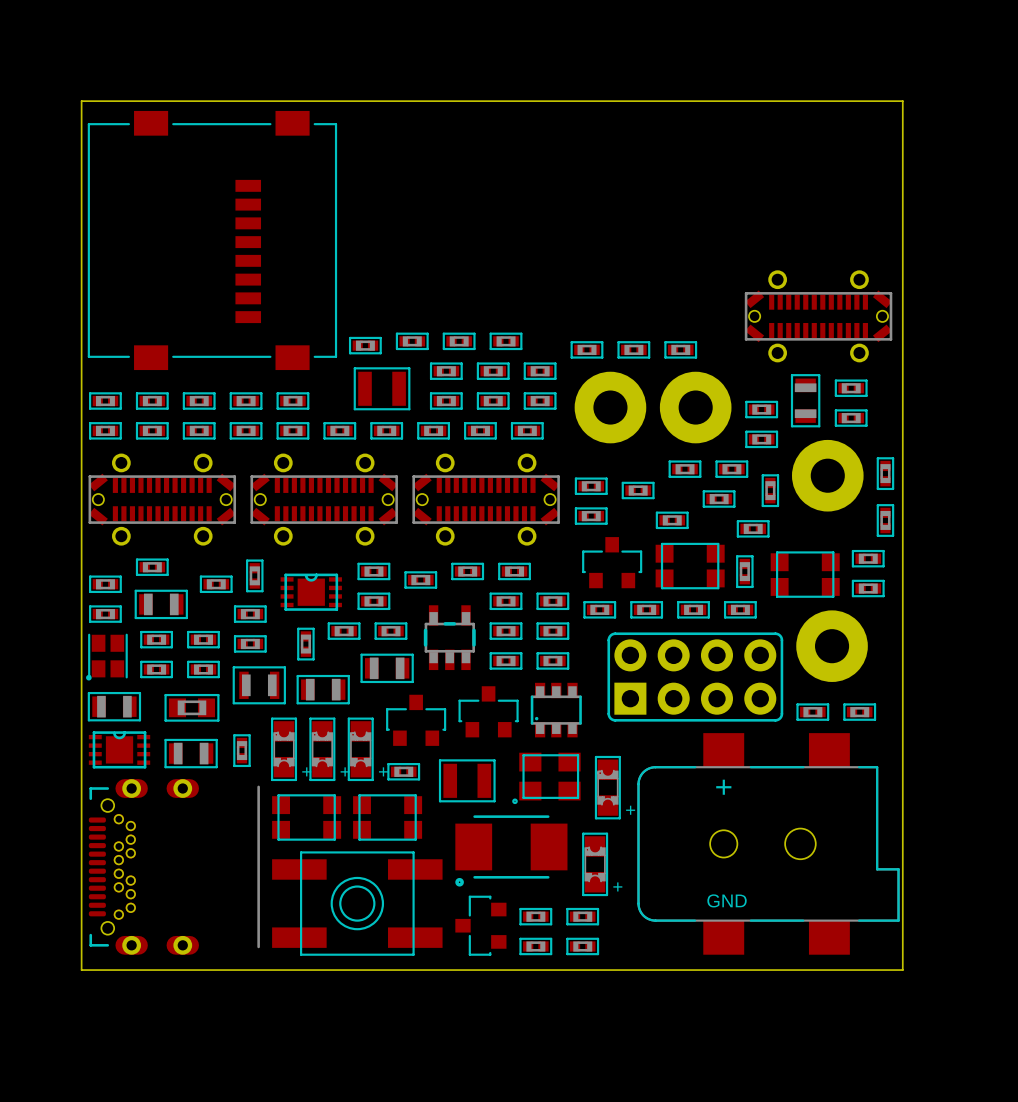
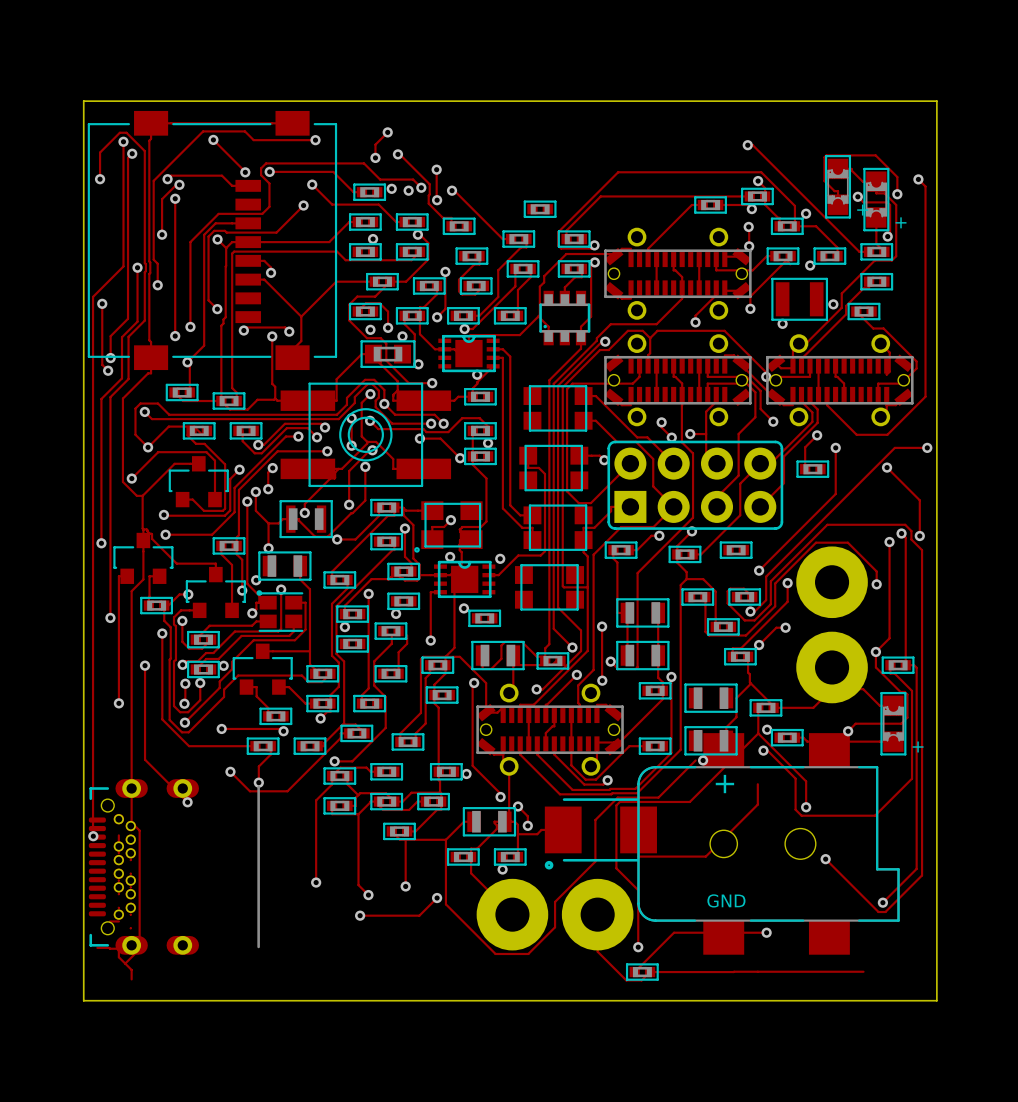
board edge: (83, 101) (81, 101) (81, 970) (902, 970) (902, 101) -> (83, 101) (83, 1000) (936, 1000) (936, 101) (902, 101)
track: none -> (292, 123) (151, 123) (151, 138) (149, 140) (149, 340) (151, 342) (151, 373) (148, 373) (122, 398) (122, 481) (136, 495) (142, 495)
track: none -> (387, 132) (375, 144) (375, 157)
via: none -> (387, 132)
track: none -> (213, 139) (245, 172)
via: none -> (213, 139)
track: none -> (315, 140) (253, 140) (244, 131) (203, 131) (153, 180) (153, 259) (157, 263) (157, 285)
via: none -> (315, 140)
track: none -> (123, 141) (123, 266) (93, 296) (93, 836)
via: none -> (123, 141)
track: none -> (747, 145) (752, 145) (859, 251) (869, 251)
via: none -> (747, 145)
track: none -> (132, 153) (128, 157) (128, 318) (110, 336) (110, 358)
via: none -> (132, 153)
track: none -> (397, 154) (429, 184) (428, 203) (442, 217) (451, 217) (451, 226)
via: none -> (397, 154)
via: none -> (375, 157)
track: none -> (838, 168) (851, 168) (862, 181) (876, 181) (876, 193) (884, 193) (896, 204) (896, 256) (891, 260) (874, 260) (841, 293) (841, 307) (805, 343) (798, 343) (792, 349) (792, 368) (780, 368) (775, 363)
track: none -> (436, 169) (437, 200)
via: none -> (436, 169)
track: none -> (269, 171) (333, 171) (353, 192) (361, 192)
via: none -> (269, 171)
via: none -> (245, 172)
track: none -> (100, 179) (100, 152) (119, 132) (126, 132) (144, 151) (144, 320) (128, 336) (128, 379) (110, 397) (110, 617)
via: none -> (100, 179)
track: none -> (167, 179) (171, 175) (221, 175) (232, 185) (248, 185)
via: none -> (167, 179)
track: none -> (918, 179) (925, 186) (925, 396) (887, 434) (856, 434) (827, 405) (827, 394)
via: none -> (918, 179)
track: none -> (758, 181) (765, 188) (765, 204) (779, 217) (779, 226)
via: none -> (758, 181)
track: none -> (179, 184) (176, 184) (162, 199) (162, 234)
via: none -> (179, 184)
track: none -> (312, 184) (332, 204) (378, 204) (396, 222) (404, 222)
via: none -> (312, 184)
part: none -> (838, 186)
track: none -> (421, 187) (413, 179) (380, 179) (364, 163) (266, 163) (261, 168) (261, 175) (269, 183) (269, 206) (262, 213) (218, 213) (190, 242) (190, 326)
via: none -> (421, 187)
via: none -> (391, 188)
via: none -> (408, 190)
track: none -> (452, 190) (454, 190) (502, 239) (511, 239)
via: none -> (452, 190)
part: none -> (369, 192)
track: none -> (897, 194) (897, 177) (875, 155) (826, 155) (824, 157) (824, 181) (834, 191) (838, 191) (838, 204)
via: none -> (897, 194)
track: none -> (749, 196) (600, 196) (566, 230) (566, 239)
part: none -> (757, 196)
track: none -> (857, 196) (863, 202) (887, 202) (890, 205) (890, 234) (887, 236)
via: none -> (857, 196)
track: none -> (175, 198) (175, 336)
via: none -> (175, 198)
part: none -> (876, 199)
via: none -> (437, 200)
track: none -> (702, 204) (691, 204) (648, 248) (648, 259)
part: none -> (710, 204)
track: none -> (718, 204) (747, 204) (751, 209)
track: none -> (303, 205) (276, 232) (214, 230) (208, 236) (208, 300) (217, 309)
via: none -> (303, 205)
part: none -> (540, 209)
via: none -> (751, 209)
via: none -> (806, 213)
track: none -> (876, 217) (876, 243) (884, 251)
track: none -> (357, 222) (349, 222) (329, 242) (232, 242) (226, 248)
part: none -> (365, 222)
part: none -> (412, 222)
track: none -> (248, 223) (215, 223) (204, 234) (204, 345) (187, 362) (189, 364) (189, 392)
part: none -> (459, 226)
track: none -> (748, 226) (749, 246)
via: none -> (748, 226)
part: none -> (787, 226)
via: none -> (162, 234)
track: none -> (417, 234) (428, 243) (428, 259) (406, 281) (390, 281) (375, 296) (357, 296) (349, 304) (349, 320) (367, 338) (380, 338) (386, 343) (386, 360) (408, 383) (432, 383)
via: none -> (417, 234)
via: none -> (887, 236)
track: none -> (217, 239) (226, 248)
via: none -> (217, 239)
via: none -> (373, 239)
part: none -> (518, 239)
track: none -> (526, 239) (526, 247) (521, 247) (498, 270) (498, 297) (479, 315) (471, 315)
part: none -> (574, 239)
track: none -> (594, 245) (591, 248) (561, 248) (558, 245) (558, 232) (618, 172) (761, 172) (794, 205) (794, 226) (816, 226) (837, 247) (837, 256)
via: none -> (594, 245)
via: none -> (749, 246)
track: none -> (226, 248) (225, 317) (221, 325) (221, 401)
track: none -> (631, 248) (621, 248) (613, 256) (611, 254) (566, 254) (544, 276) (544, 282) (539, 286) (538, 316)
part: none -> (365, 251)
part: none -> (412, 251)
track: none -> (419, 251) (411, 260) (345, 260) (337, 251) (234, 251) (232, 253) (232, 388) (236, 392) (236, 401)
part: none -> (876, 251)
part: none -> (471, 256)
track: none -> (479, 256) (479, 264) (474, 264) (459, 279) (459, 291) (462, 294) (475, 294) (483, 285)
track: none -> (724, 256) (741, 256)
track: none -> (775, 256) (766, 256) (752, 270) (716, 270) (716, 259)
part: none -> (783, 256)
part: none -> (829, 256)
track: none -> (656, 259) (656, 287)
track: none -> (673, 259) (673, 270) (682, 277) (682, 298) (656, 324) (610, 324) (553, 383) (553, 628) (572, 647)
track: none -> (699, 259) (699, 287)
track: none -> (248, 260) (264, 260) (271, 267) (271, 272)
track: none -> (594, 262) (591, 263) (591, 316) (581, 326) (581, 348) (549, 380) (549, 644) (545, 648) (545, 656) (536, 656) (521, 641) (505, 641) (501, 645) (501, 658) (491, 669) (482, 669) (482, 655)
via: none -> (594, 262)
track: none -> (790, 264) (784, 262) (750, 296) (750, 308)
via: none -> (810, 265)
track: none -> (137, 267) (137, 321) (122, 337) (122, 378) (101, 398) (101, 543)
via: none -> (137, 267)
track: none -> (515, 268) (515, 286) (472, 329) (464, 329)
part: none -> (523, 268)
track: none -> (530, 268) (530, 277) (517, 290) (517, 315)
part: none -> (574, 268)
track: none -> (581, 268) (581, 277) (575, 277) (564, 287) (564, 298)
track: none -> (445, 271) (445, 309) (437, 317)
via: none -> (445, 271)
via: none -> (271, 272)
part: none -> (677, 273)
track: none -> (248, 279) (264, 279) (301, 316)
track: none -> (374, 281) (336, 281) (301, 316)
part: none -> (382, 281)
track: none -> (869, 281) (869, 288) (863, 288) (846, 305) (846, 314) (801, 358) (801, 366)
part: none -> (876, 281)
via: none -> (157, 285)
part: none -> (429, 285)
track: none -> (436, 285) (436, 294) (423, 307) (419, 307) (419, 334) (435, 349) (454, 349) (458, 353) (468, 353) (470, 335) (519, 335) (538, 316)
part: none -> (476, 285)
track: none -> (716, 287) (716, 295) (695, 315) (695, 322)
track: none -> (613, 290) (621, 298) (631, 298)
track: none -> (724, 290) (741, 290)
part: none -> (799, 299)
track: none -> (102, 303) (102, 364) (108, 370)
via: none -> (102, 303)
via: none -> (833, 304)
via: none -> (750, 308)
via: none -> (217, 309)
track: none -> (357, 311) (366, 303) (379, 303) (388, 311) (388, 327)
part: none -> (365, 311)
track: none -> (856, 311) (873, 328) (883, 328) (916, 361) (916, 368) (901, 383) (878, 383) (878, 394)
part: none -> (863, 311)
track: none -> (404, 315) (404, 324) (414, 334) (414, 360) (418, 364)
part: none -> (463, 315)
part: none -> (510, 315)
track: none -> (301, 316) (301, 341) (292, 349) (292, 357)
track: none -> (538, 316) (548, 326) (548, 337)
part: (818, 316) -> none
via: none -> (437, 317)
via: none -> (695, 322)
via: none -> (782, 323)
via: none -> (190, 326)
via: none -> (388, 327)
via: none -> (370, 329)
via: none -> (464, 329)
track: none -> (243, 330) (246, 327) (285, 327) (289, 331)
via: none -> (243, 330)
via: none -> (289, 331)
via: none -> (175, 336)
track: none -> (272, 336) (272, 383) (275, 386) (275, 398)
via: none -> (272, 336)
via: none -> (402, 336)
track: none -> (650, 338) (642, 330) (627, 330) (608, 350) (600, 350) (562, 387) (562, 586) (587, 587)
track: none -> (650, 338) (657, 330) (724, 330) (766, 372) (766, 376) (810, 376) (810, 366)
track: none -> (650, 338) (648, 366)
part position: (412, 341) -> (412, 315)
part: (459, 341) -> none
part: (506, 341) -> none
track: none -> (605, 341) (602, 341) (558, 385) (558, 607) (581, 630) (581, 651) (542, 689) (536, 689)
via: none -> (605, 341)
track: none -> (880, 343) (889, 352) (889, 371) (886, 374) (886, 366)
part: (365, 345) -> none
track: none -> (493, 349) (502, 349) (510, 356) (510, 505) (520, 515) (532, 515)
part: (586, 349) -> none
part: (633, 349) -> none
part: (680, 349) -> none
part: none -> (468, 353)
track: none -> (370, 354) (397, 381) (397, 390) (393, 394) (393, 400) (454, 400) (458, 396) (472, 396) (472, 388) (493, 366)
track: none -> (373, 354) (361, 354) (336, 379) (336, 400) (277, 400) (275, 398)
track: none -> (724, 355) (733, 355) (773, 397) (783, 405) (792, 405)
track: none -> (493, 357) (502, 357) (502, 508) (522, 527) (532, 527) (532, 540)
via: none -> (110, 358)
via: none -> (187, 362)
via: none -> (418, 364)
track: none -> (639, 366) (639, 376) (632, 383) (572, 383) (567, 389) (567, 491) (578, 503) (590, 503) (630, 463)
track: none -> (656, 366) (656, 394)
track: none -> (673, 366) (673, 376) (682, 383) (681, 442) (693, 453) (693, 517) (637, 573) (637, 667) (635, 669) (618, 669) (610, 661)
track: none -> (699, 366) (699, 394)
track: none -> (707, 366) (707, 376) (746, 376) (760, 390) (760, 409) (773, 421)
track: none -> (818, 366) (818, 394)
track: none -> (835, 366) (835, 376) (844, 383) (844, 394)
via: none -> (108, 370)
part: (446, 371) -> none
part: (493, 371) -> none
part: (540, 371) -> none
via: none -> (477, 374)
via: none -> (766, 376)
part footprint: [834, 379, 868, 397] -> [766, 334, 914, 427]
part: none -> (677, 380)
via: none -> (432, 383)
part: (382, 388) -> none
track: none -> (174, 392) (183, 401) (221, 401)
part: none -> (182, 392)
track: none -> (370, 394) (361, 402) (361, 436) (367, 441)
via: none -> (370, 394)
track: none -> (707, 394) (707, 383) (746, 383) (755, 392) (755, 417) (738, 433) (738, 475) (716, 497) (716, 506)
track: none -> (716, 394) (716, 401) (706, 411) (706, 452) (716, 463)
track: none -> (801, 394) (801, 401) (812, 412) (812, 421) (770, 463) (760, 463) (740, 483) (740, 515) (701, 554) (692, 554)
track: none -> (810, 394) (810, 401) (817, 409) (817, 422) (784, 456) (784, 483) (760, 506)
track: none -> (583, 396) (595, 396) (637, 437) (647, 437) (673, 463)
track: none -> (613, 397) (621, 405) (631, 405)
track: none -> (903, 397) (895, 405) (886, 405)
track: none -> (275, 398) (257, 399) (247, 409) (230, 409) (221, 401)
part: (805, 400) -> none
part: (105, 401) -> none
part: (152, 401) -> none
part: (199, 401) -> none
part: none -> (229, 401)
part: (246, 401) -> none
part: (292, 401) -> none
part: (446, 401) -> none
part position: (493, 401) -> (480, 396)
part: (540, 401) -> none
via: none -> (384, 403)
part: (610, 407) -> none
part: (695, 407) -> none
part: none -> (558, 408)
part: (761, 409) -> none
track: none -> (144, 411) (152, 419) (338, 419) (354, 403) (354, 397) (367, 384) (372, 384) (378, 390) (375, 407) (392, 423) (431, 423)
via: none -> (144, 411)
track: none -> (351, 418) (351, 445)
via: none -> (351, 418)
part: (851, 418) -> none
track: none -> (370, 420) (378, 429) (423, 429) (426, 432) (448, 432) (462, 418) (479, 418) (488, 426)
via: none -> (370, 420)
track: none -> (583, 420) (595, 420) (616, 441) (635, 441) (653, 459) (653, 486) (673, 506) (653, 527) (621, 527) (593, 554) (593, 670) (578, 685) (579, 715)
via: none -> (773, 421)
track: none -> (661, 422) (661, 427) (671, 437)
via: none -> (661, 422)
via: none -> (431, 423)
track: none -> (443, 423) (434, 414) (395, 414) (384, 403) (384, 389) (374, 379) (365, 379) (346, 397) (346, 404) (336, 414) (169, 414) (158, 403) (140, 403) (135, 408) (135, 434) (148, 447) (168, 426) (194, 426) (202, 435)
via: none -> (443, 423)
track: none -> (472, 426) (472, 464) (486, 478) (486, 521) (481, 526) (462, 526) (459, 529) (460, 539) (458, 545) (461, 552) (461, 563) (450, 575) (419, 575)
track: none -> (325, 427) (321, 423) (284, 423) (263, 444) (258, 444)
via: none -> (325, 427)
part: (105, 430) -> none
part: (152, 430) -> none
track: none -> (242, 430) (242, 441) (254, 453) (261, 453) (286, 428) (307, 428) (317, 437)
part: (292, 430) -> none
part: (339, 430) -> none
part: (386, 430) -> none
part: (433, 430) -> none
part: (527, 430) -> none
part: none -> (365, 434)
track: none -> (690, 434) (706, 434)
via: none -> (690, 434)
track: none -> (187, 435) (196, 443) (204, 443) (225, 464) (225, 508) (222, 510) (204, 510) (192, 499) (182, 499)
track: none -> (817, 435) (805, 447) (805, 469)
via: none -> (817, 435)
track: none -> (298, 436) (285, 436) (234, 487) (234, 512) (212, 534) (165, 534)
via: none -> (298, 436)
via: none -> (317, 437)
via: none -> (671, 437)
track: none -> (419, 438) (440, 438) (460, 458)
via: none -> (419, 438)
part: (761, 439) -> none
part footprint: [791, 439, 864, 512] -> [796, 460, 830, 478]
track: none -> (367, 441) (376, 441) (393, 459) (393, 468) (423, 468)
track: none -> (367, 441) (341, 468) (307, 468)
via: none -> (488, 443)
via: none -> (258, 444)
via: none -> (351, 445)
via: none -> (148, 447)
track: none -> (835, 447) (835, 494) (759, 570)
via: none -> (835, 447)
track: none -> (927, 447) (894, 447) (766, 576) (766, 600) (754, 611) (750, 611)
via: none -> (927, 447)
track: none -> (372, 450) (369, 450) (349, 471) (349, 504)
via: none -> (372, 450)
track: none -> (327, 451) (277, 451) (238, 489) (238, 535) (236, 537) (236, 554) (242, 559) (242, 590)
via: none -> (327, 451)
track: none -> (528, 455) (528, 467) (538, 467) (544, 474) (544, 551) (540, 555) (518, 555) (498, 575) (488, 575)
track: none -> (579, 455) (599, 455) (604, 460)
part: none -> (480, 456)
via: none -> (460, 458)
via: none -> (604, 460)
track: none -> (198, 463) (174, 463) (142, 495)
track: none -> (365, 466) (365, 500) (327, 536) (315, 536) (298, 519) (282, 519) (278, 523) (268, 523)
via: none -> (365, 466)
track: none -> (887, 467) (919, 500) (919, 536)
via: none -> (887, 467)
track: none -> (272, 468) (268, 472) (268, 489)
via: none -> (272, 468)
part: none -> (553, 468)
track: none -> (239, 469) (230, 479) (230, 510) (224, 515) (163, 514)
via: none -> (239, 469)
track: none -> (338, 469) (335, 472) (335, 477) (330, 478) (304, 504) (304, 512)
part: (684, 469) -> none
part: (731, 469) -> none
part: (885, 473) -> none
track: none -> (131, 478) (158, 452) (206, 452) (214, 460) (214, 499)
via: none -> (131, 478)
part: none -> (198, 481)
part: (591, 486) -> none
via: none -> (268, 489)
part: (638, 490) -> none
part: (770, 490) -> none
track: none -> (255, 491) (255, 510) (268, 523)
via: none -> (255, 491)
track: none -> (142, 495) (142, 528) (152, 534) (152, 538) (176, 563) (215, 563) (215, 574)
part: (162, 499) -> none
part: (324, 499) -> none
part: (486, 499) -> none
part: (719, 499) -> none
track: none -> (247, 501) (247, 583) (259, 595) (259, 602)
via: none -> (247, 501)
via: none -> (349, 504)
track: none -> (630, 506) (611, 506) (611, 511) (594, 527) (583, 527) (583, 552) (587, 556) (587, 650) (533, 704) (520, 704) (520, 715)
track: none -> (379, 507) (379, 515) (355, 539) (337, 539)
part: none -> (386, 507)
track: none -> (403, 508) (406, 510) (432, 510)
via: none -> (304, 512)
via: none -> (163, 514)
part: (591, 516) -> none
track: none -> (450, 520) (444, 526) (432, 526) (432, 539)
via: none -> (450, 520)
part: (672, 520) -> none
part: (885, 520) -> none
track: none -> (268, 523) (268, 548)
part: none -> (558, 527)
track: none -> (404, 528) (404, 556) (411, 563) (411, 571)
via: none -> (404, 528)
part: (753, 528) -> none
track: none -> (143, 529) (143, 579) (131, 591) (131, 822) (139, 830) (139, 949) (125, 963)
track: none -> (691, 531) (677, 546) (677, 562) (686, 572) (686, 579)
via: none -> (691, 531)
track: none -> (901, 533) (905, 537) (905, 665) (914, 665) (916, 667) (916, 868) (882, 902)
via: none -> (901, 533)
via: none -> (165, 534)
track: none -> (659, 535) (651, 535) (637, 550) (628, 550)
via: none -> (659, 535)
via: none -> (919, 536)
part footprint: [582, 537, 643, 589] -> [604, 541, 638, 559]
via: none -> (337, 539)
part: none -> (386, 541)
track: none -> (394, 541) (394, 550) (336, 606) (336, 653) (344, 661) (344, 724)
part footprint: [655, 542, 725, 590] -> [668, 545, 702, 564]
track: none -> (889, 542) (889, 638) (875, 651) (875, 667) (900, 691) (904, 691) (907, 694) (907, 717) (901, 723) (855, 723) (848, 731)
via: none -> (889, 542)
via: none -> (101, 543)
track: none -> (221, 545) (221, 554) (232, 564) (232, 610)
part: none -> (229, 545)
via: none -> (268, 548)
track: none -> (613, 550) (613, 558) (617, 562) (617, 612) (627, 612) (627, 655)
part: none -> (736, 550)
via: none -> (450, 556)
part footprint: [135, 558, 169, 576] -> [113, 532, 174, 584]
via: none -> (500, 558)
part: (868, 558) -> none
part footprint: [451, 562, 485, 581] -> [434, 560, 496, 599]
part: none -> (284, 566)
track: none -> (300, 566) (300, 579) (309, 589) (309, 664) (315, 669) (315, 673)
via: none -> (759, 570)
part: (373, 571) -> none
part: none -> (403, 571)
part: (514, 571) -> none
part: (744, 571) -> none
part: (805, 574) -> none
part footprint: [199, 575, 233, 594] -> [185, 566, 246, 619]
part: (254, 575) -> none
track: none -> (127, 576) (118, 576) (118, 703)
track: none -> (159, 576) (149, 576) (148, 605)
part: none -> (339, 579)
track: none -> (347, 579) (347, 588) (331, 603) (331, 655) (338, 662) (338, 686) (330, 695) (330, 711) (327, 711) (320, 718)
track: none -> (388, 579) (371, 579) (344, 605) (344, 614)
track: none -> (388, 579) (392, 576) (399, 576) (405, 580) (417, 580) (419, 577) (419, 564) (413, 558) (413, 525) (403, 515) (402, 507) (394, 507) (394, 515) (387, 515) (332, 571) (332, 579)
part: (420, 579) -> none
track: none -> (464, 579) (454, 579) (454, 647) (445, 656) (445, 673) (434, 684) (434, 703) (438, 707) (440, 792)
track: none -> (686, 579) (680, 585) (680, 749) (637, 793) (559, 794) (520, 754) (520, 743)
track: none -> (686, 579) (703, 579) (715, 591) (715, 626)
via: none -> (256, 580)
part: none -> (832, 582)
track: none -> (787, 583) (787, 601) (741, 648) (732, 648) (732, 656)
via: none -> (787, 583)
part: (105, 584) -> none
track: none -> (876, 584) (876, 571) (847, 542) (816, 542) (775, 583) (775, 606) (745, 635) (709, 635) (705, 631) (705, 597)
via: none -> (876, 584)
part: (868, 588) -> none
part footprint: [134, 589, 188, 620] -> [140, 596, 174, 615]
track: none -> (281, 589) (281, 628) (278, 631) (234, 631) (213, 653) (206, 653) (198, 661) (186, 661) (182, 664)
via: none -> (281, 589)
via: none -> (242, 590)
part: (311, 592) -> none
track: none -> (440, 592) (430, 592) (430, 640)
part footprint: [536, 592, 570, 611] -> [515, 564, 585, 611]
track: none -> (368, 593) (368, 688) (361, 695) (361, 703)
via: none -> (368, 593)
track: none -> (188, 594) (179, 594) (164, 609)
via: none -> (188, 594)
part: none -> (744, 597)
track: none -> (752, 597) (743, 588) (730, 588) (727, 591) (727, 603) (744, 620) (754, 620) (770, 604) (770, 581) (827, 524) (905, 524) (911, 530) (911, 539) (922, 550) (922, 875) (885, 912) (878, 912) (825, 859)
part: (373, 601) -> none
part: none -> (403, 601)
part: (506, 601) -> none
part footprint: [630, 601, 664, 619] -> [616, 598, 670, 628]
track: none -> (268, 602) (256, 602) (256, 609) (252, 613)
track: none -> (293, 602) (305, 602) (305, 629) (294, 640) (253, 640) (232, 661) (232, 669) (219, 681) (219, 687) (184, 722)
track: none -> (164, 605) (164, 620) (170, 627) (169, 720) (181, 732) (188, 732) (224, 696) (224, 689) (238, 675) (301, 675) (308, 682) (322, 682) (330, 673)
via: none -> (463, 608)
part: (599, 609) -> none
part position: (693, 609) -> (697, 597)
part: (740, 609) -> none
track: none -> (199, 610) (181, 610) (173, 617) (175, 626) (174, 706) (180, 712) (188, 712) (200, 700) (200, 682)
via: none -> (750, 611)
track: none -> (658, 612) (658, 677) (662, 682) (662, 699) (619, 742) (596, 742) (596, 760) (590, 766)
via: none -> (252, 613)
via: none -> (396, 613)
part: (105, 614) -> none
part: (250, 614) -> none
part: none -> (352, 614)
via: none -> (110, 617)
part: none -> (484, 618)
track: none -> (182, 620) (182, 641) (189, 648) (202, 648) (211, 639)
via: none -> (182, 620)
track: none -> (268, 621) (256, 621) (252, 625) (209, 625) (195, 639)
track: none -> (293, 621) (293, 631) (289, 635) (241, 635) (218, 658) (206, 658) (195, 669)
track: none -> (602, 626) (602, 680)
via: none -> (602, 626)
part: none -> (723, 626)
via: none -> (344, 627)
track: none -> (785, 627) (776, 627) (759, 645)
via: none -> (785, 627)
part: (344, 631) -> none
part: (506, 631) -> none
part: (552, 631) -> none
track: none -> (162, 633) (162, 719) (189, 746) (255, 746)
via: none -> (162, 633)
track: none -> (391, 635) (391, 643) (374, 661) (374, 685) (385, 697) (385, 727) (352, 761) (334, 761)
track: none -> (407, 635) (407, 643) (398, 652) (398, 673)
part: (449, 637) -> none
part: (156, 639) -> none
via: none -> (430, 640)
part: (250, 643) -> none
part: none -> (352, 643)
part: (305, 644) -> none
via: none -> (759, 645)
part position: (832, 646) -> (832, 667)
via: none -> (572, 647)
track: none -> (262, 651) (309, 651)
via: none -> (875, 651)
part footprint: [489, 652, 523, 670] -> [471, 640, 525, 671]
part footprint: [360, 653, 414, 684] -> [374, 664, 408, 683]
track: none -> (513, 655) (513, 688)
part: none -> (642, 655)
track: none -> (560, 656) (552, 665) (513, 665)
part: none -> (740, 656)
track: none -> (748, 656) (749, 682) (775, 707)
part rotation: 0° (106, 657) -> 90° clockwise (279, 611)
part position: (106, 657) -> (279, 611)
via: none -> (610, 661)
via: none -> (182, 664)
track: none -> (145, 665) (145, 759) (187, 802)
via: none -> (145, 665)
via: none -> (223, 665)
track: none -> (430, 665) (430, 673) (425, 678) (425, 723) (415, 733) (415, 741)
part: none -> (437, 665)
track: none -> (890, 665) (890, 673) (894, 673) (912, 690) (912, 778) (875, 815) (801, 815) (795, 809) (795, 778) (767, 750) (763, 750)
part: none -> (898, 665)
part: (156, 669) -> none
part: none -> (262, 669)
part: none -> (322, 673)
track: none -> (576, 674) (545, 704) (545, 715)
via: none -> (576, 674)
track: none -> (671, 676) (671, 752) (635, 788) (572, 789) (537, 754) (537, 743)
via: none -> (671, 676)
part position: (695, 677) -> (695, 485)
via: none -> (602, 680)
via: none -> (200, 682)
track: none -> (474, 682) (472, 765) (500, 793) (500, 796)
via: none -> (474, 682)
track: none -> (185, 683) (184, 703)
via: none -> (185, 683)
track: none -> (751, 683) (736, 698) (736, 717) (726, 727) (726, 740)
part position: (259, 685) -> (306, 519)
track: none -> (246, 687) (256, 687) (256, 696) (268, 707) (268, 716)
track: none -> (278, 687) (289, 687) (305, 703) (315, 703)
part: (323, 689) -> none
via: none -> (536, 689)
part: none -> (655, 690)
part: none -> (442, 695)
part: none -> (711, 698)
via: none -> (118, 703)
via: none -> (184, 703)
part: none -> (322, 703)
part: none -> (369, 703)
track: none -> (596, 704) (606, 704) (613, 712)
track: none -> (893, 705) (879, 705) (863, 689) (832, 689) (813, 707) (773, 707)
part: (114, 706) -> none
part position: (191, 707) -> (388, 354)
track: none -> (503, 707) (497, 712) (486, 712) (486, 683) (459, 656) (423, 656) (420, 659) (420, 712) (400, 733) (400, 741)
track: none -> (758, 707) (758, 733)
part: none -> (765, 707)
part position: (556, 710) -> (564, 318)
part: (488, 711) -> none
part: (812, 712) -> none
part: (859, 712) -> none
track: none -> (528, 715) (528, 743)
track: none -> (554, 715) (554, 726) (545, 733) (545, 743)
track: none -> (571, 715) (571, 765) (585, 779) (596, 779) (629, 746) (647, 746)
part: none -> (275, 716)
part footprint: [309, 717, 336, 782] -> [293, 737, 327, 755]
part footprint: [347, 717, 374, 782] -> [340, 724, 374, 743]
via: none -> (320, 718)
part: (416, 720) -> none
via: none -> (184, 722)
part: none -> (893, 723)
track: none -> (221, 728) (283, 728)
via: none -> (221, 728)
part: none -> (550, 729)
via: none -> (767, 729)
via: none -> (283, 731)
via: none -> (848, 731)
track: none -> (349, 733) (340, 733) (340, 737) (287, 791) (249, 791) (230, 771)
track: none -> (364, 733) (355, 724) (342, 724) (324, 743) (324, 746) (317, 746)
track: none -> (758, 733) (806, 781) (806, 807)
track: none -> (758, 733) (689, 801) (619, 801) (616, 805) (616, 868) (638, 890) (638, 947)
part: none -> (787, 737)
track: none -> (794, 737) (803, 737) (807, 741) (893, 741)
part: none -> (711, 740)
part: none -> (408, 741)
track: none -> (503, 743) (503, 760) (509, 766) (509, 819) (511, 821)
track: none -> (554, 743) (554, 754) (584, 784) (603, 784) (607, 780)
track: none -> (270, 746) (270, 754) (258, 766) (258, 782)
track: none -> (486, 746) (494, 754) (503, 754)
part: none -> (655, 746)
part: (119, 749) -> none
part: (284, 749) -> none
part rotation: 0° (241, 750) -> 90° clockwise (263, 746)
part position: (241, 750) -> (263, 746)
via: none -> (763, 750)
part: (191, 753) -> none
track: none -> (695, 760) (658, 797) (617, 797) (595, 820) (595, 861) (555, 901) (555, 927) (528, 953) (495, 953) (445, 904) (445, 839)
via: none -> (703, 760)
via: none -> (334, 761)
via: none -> (230, 771)
track: none -> (379, 771) (370, 771) (366, 767) (340, 767) (332, 776) (332, 784) (316, 800) (316, 882)
part: none -> (386, 771)
part: (403, 771) -> none
part: none -> (446, 771)
via: none -> (466, 773)
part: none -> (339, 776)
track: none -> (347, 776) (347, 784) (358, 795)
part position: (546, 778) -> (448, 526)
part: (467, 780) -> none
via: none -> (607, 780)
via: none -> (258, 782)
track: none -> (757, 784) (757, 804) (705, 856) (638, 856) (638, 829)
part: (607, 787) -> none
track: none -> (440, 792) (411, 792) (402, 801) (394, 801) (385, 793) (360, 793) (358, 795)
track: none -> (440, 792) (441, 809) (436, 809) (415, 831) (407, 831)
track: none -> (358, 795) (355, 797) (355, 805) (347, 805)
via: none -> (500, 796)
track: none -> (374, 801) (383, 809) (409, 809) (417, 801) (425, 801)
track: none -> (379, 801) (370, 801) (358, 814)
part: none -> (386, 801)
part: none -> (433, 801)
via: none -> (187, 802)
track: none -> (332, 805) (332, 814) (358, 814)
part: none -> (339, 805)
track: none -> (518, 806) (527, 816) (527, 825)
via: none -> (518, 806)
via: none -> (806, 807)
track: none -> (358, 814) (358, 885) (368, 895)
part footprint: [455, 815, 568, 887] -> [493, 848, 527, 866]
part: (306, 817) -> none
part: (387, 817) -> none
track: none -> (474, 821) (463, 821) (445, 839)
part: none -> (489, 821)
via: none -> (527, 825)
track: none -> (563, 829) (541, 829) (537, 834) (517, 834)
track: none -> (391, 831) (400, 839) (445, 839)
part: none -> (399, 831)
part: none -> (600, 833)
track: none -> (118, 835) (118, 853)
via: none -> (93, 836)
track: none -> (405, 839) (405, 886)
part: none -> (463, 856)
track: none -> (517, 856) (517, 824) (514, 821) (494, 821) (496, 828) (477, 848) (471, 848) (471, 873) (512, 914)
via: none -> (825, 859)
part: (595, 864) -> none
via: none -> (502, 869)
via: none -> (316, 882)
via: none -> (405, 886)
via: none -> (368, 895)
track: none -> (437, 898) (419, 915) (360, 915)
via: none -> (437, 898)
via: none -> (882, 902)
part: (357, 903) -> none
part footprint: [566, 907, 600, 926] -> [561, 878, 634, 951]
part: none -> (512, 914)
track: none -> (597, 914) (597, 951) (626, 980) (641, 980) (650, 972) (863, 971)
via: none -> (360, 915)
part: (535, 916) -> none
track: none -> (110, 921) (118, 921)
part: (480, 925) -> none
track: none -> (766, 932) (674, 932) (634, 972)
via: none -> (766, 932)
part: (535, 946) -> none
part: (582, 946) -> none
track: none -> (97, 947) (118, 948) (118, 957) (131, 969) (131, 979)
via: none -> (638, 947)
part: none -> (642, 972)

